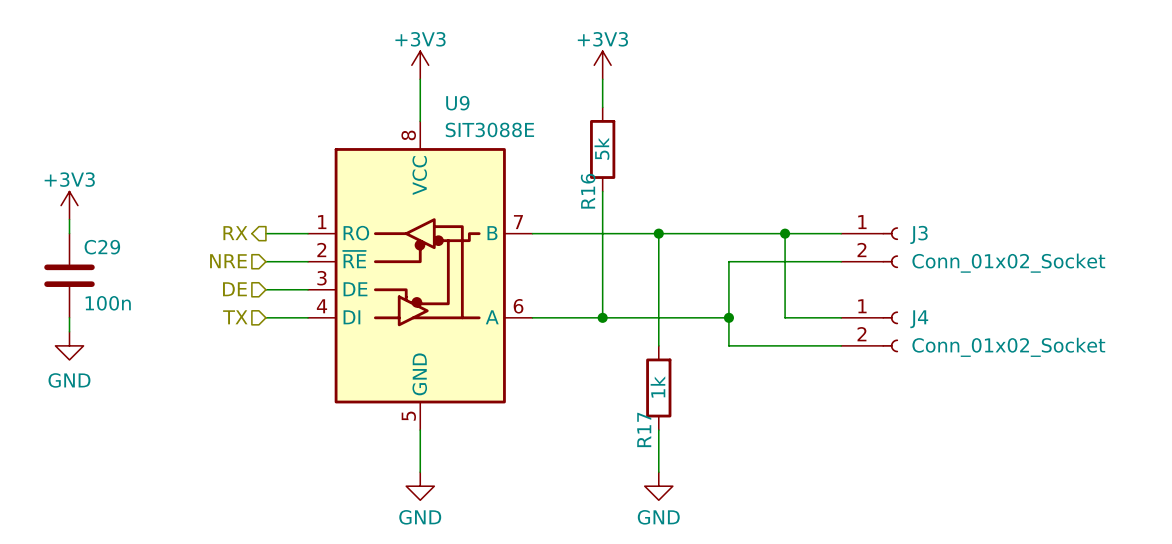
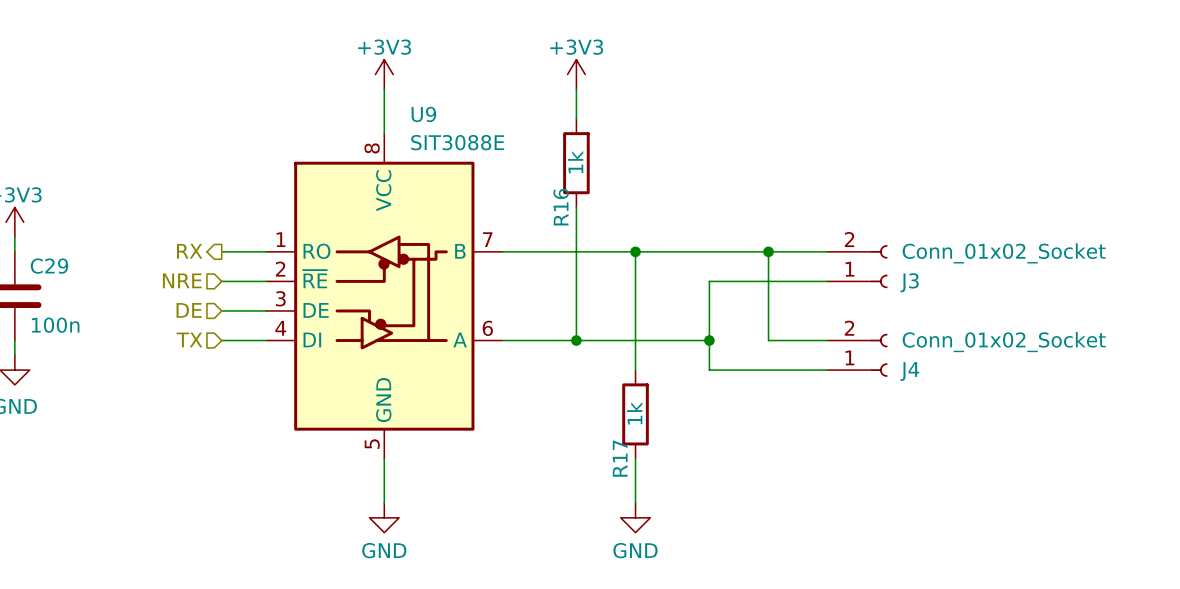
R16 value: 5k (601, 148) -> 1k (575, 162)
J3 flip: as is (890, 247) -> up-down (879, 266)
J4 flip: as is (890, 331) -> up-down (879, 355)

